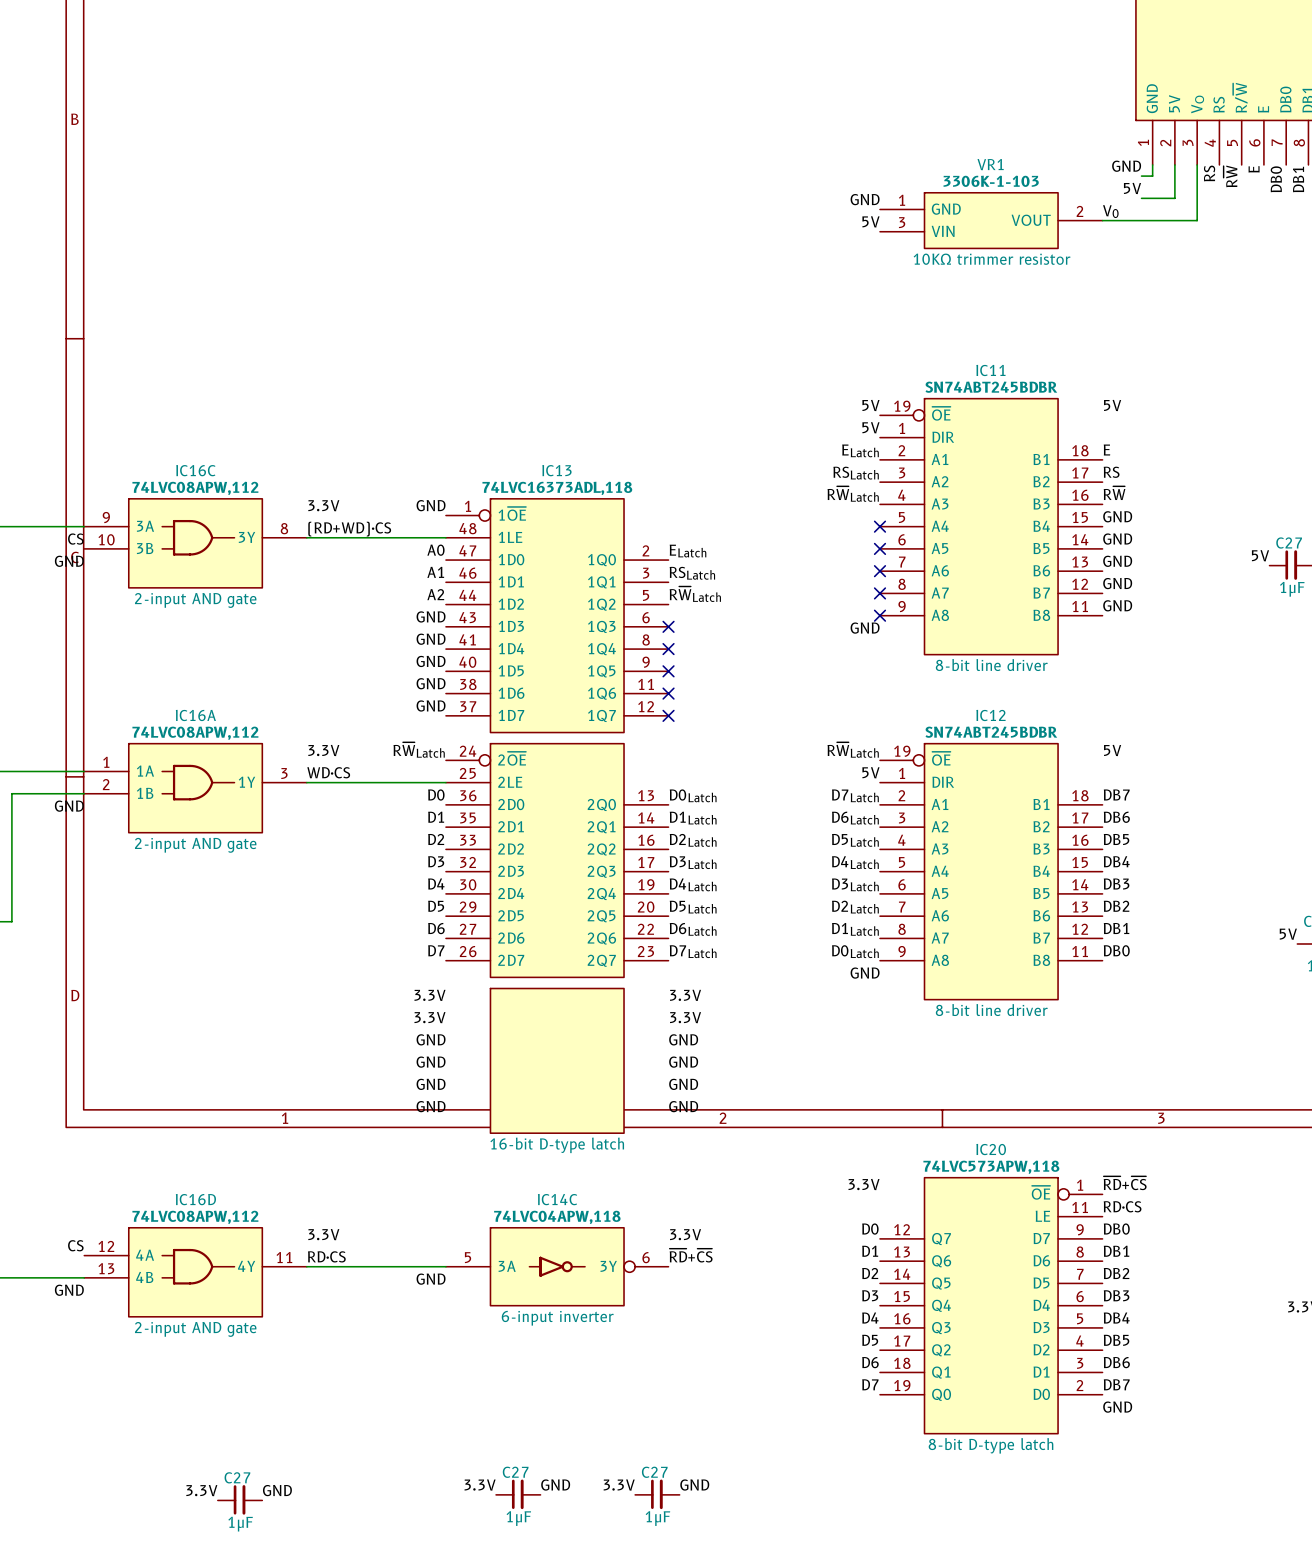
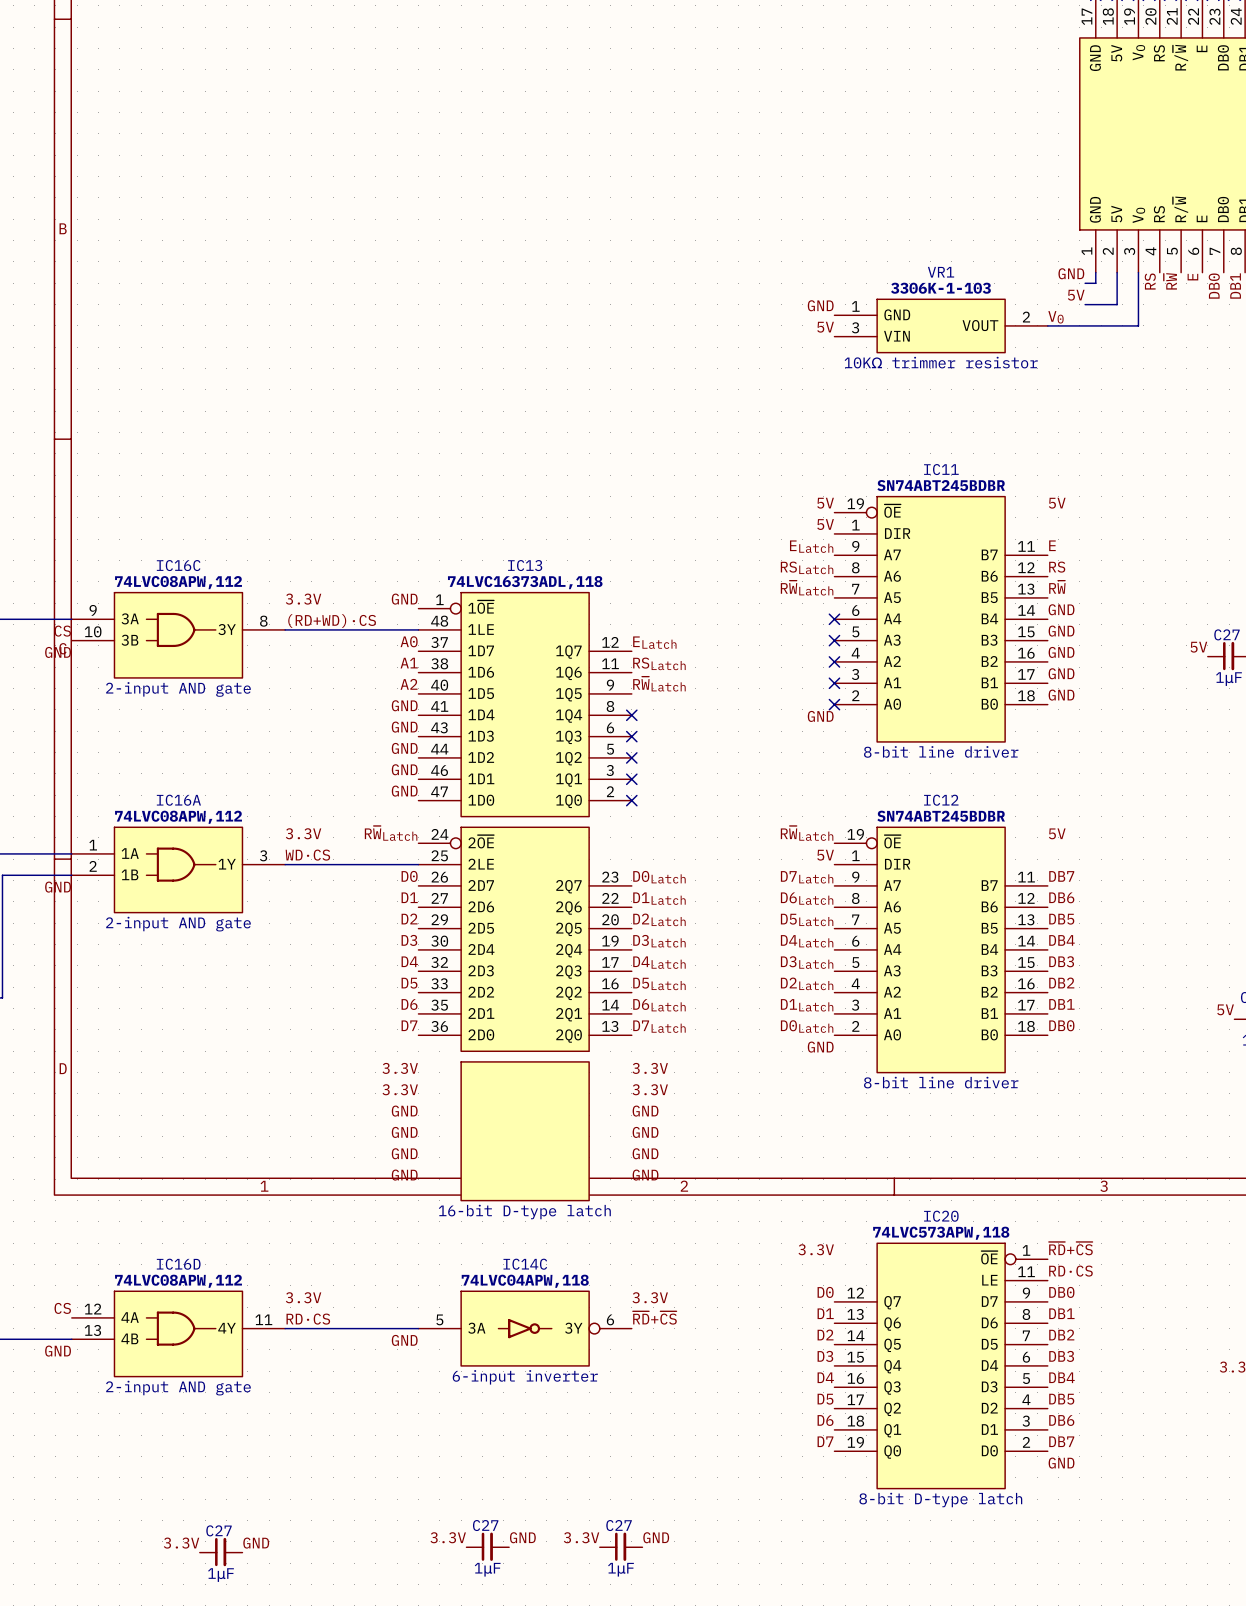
IC11 symbol: [879, 398, 1103, 656] -> [834, 495, 1048, 743]
IC13 symbol: [445, 498, 669, 1134] -> [418, 591, 632, 1202]
IC12 symbol: [879, 743, 1103, 1001] -> [834, 826, 1048, 1074]

